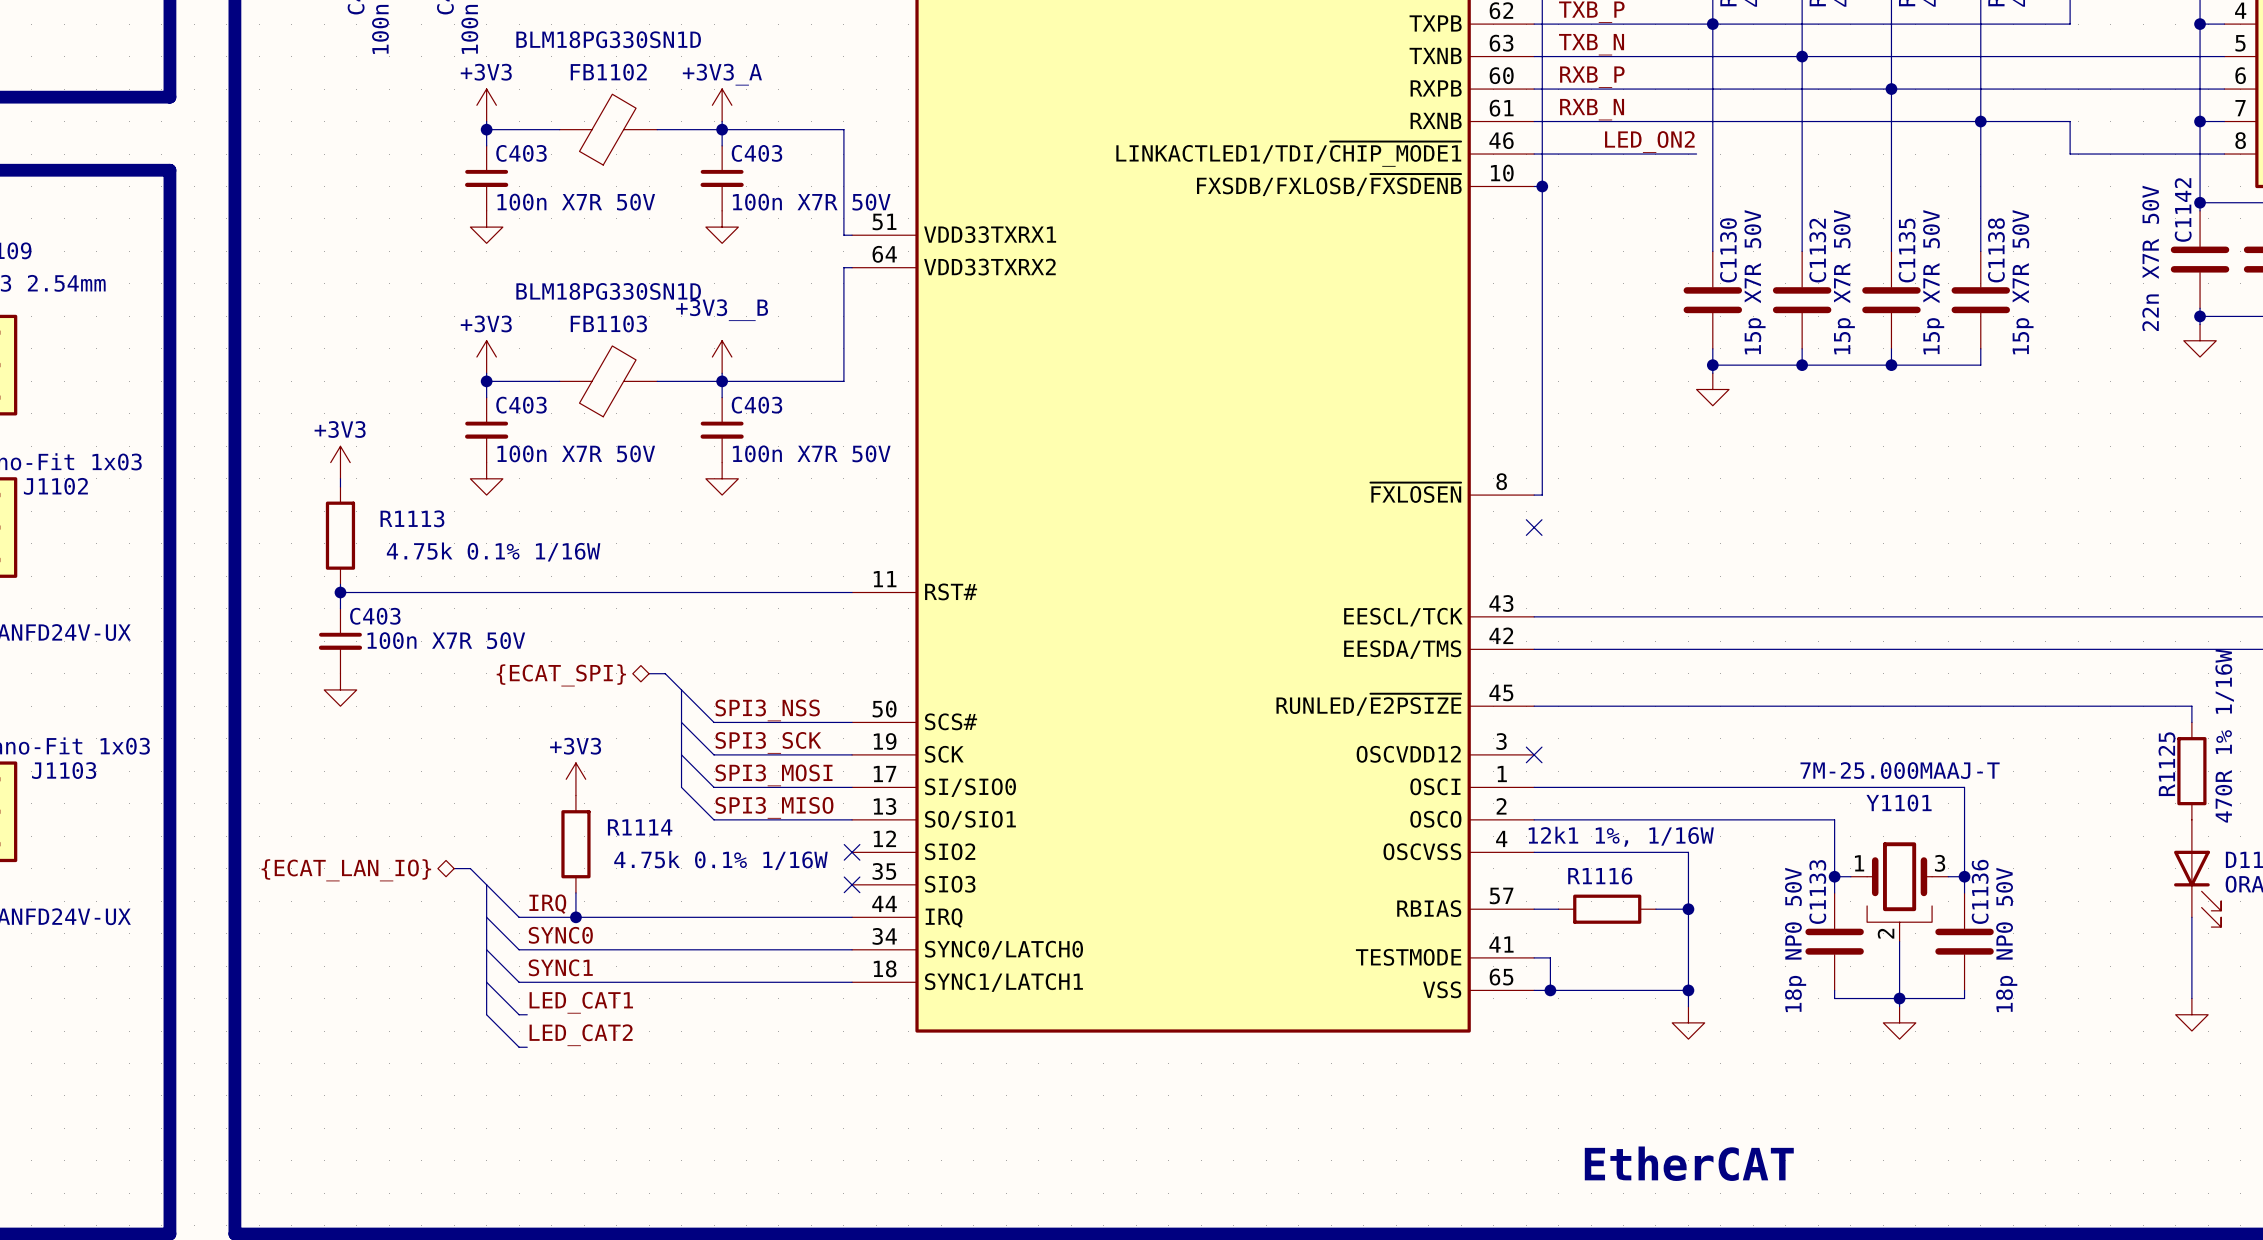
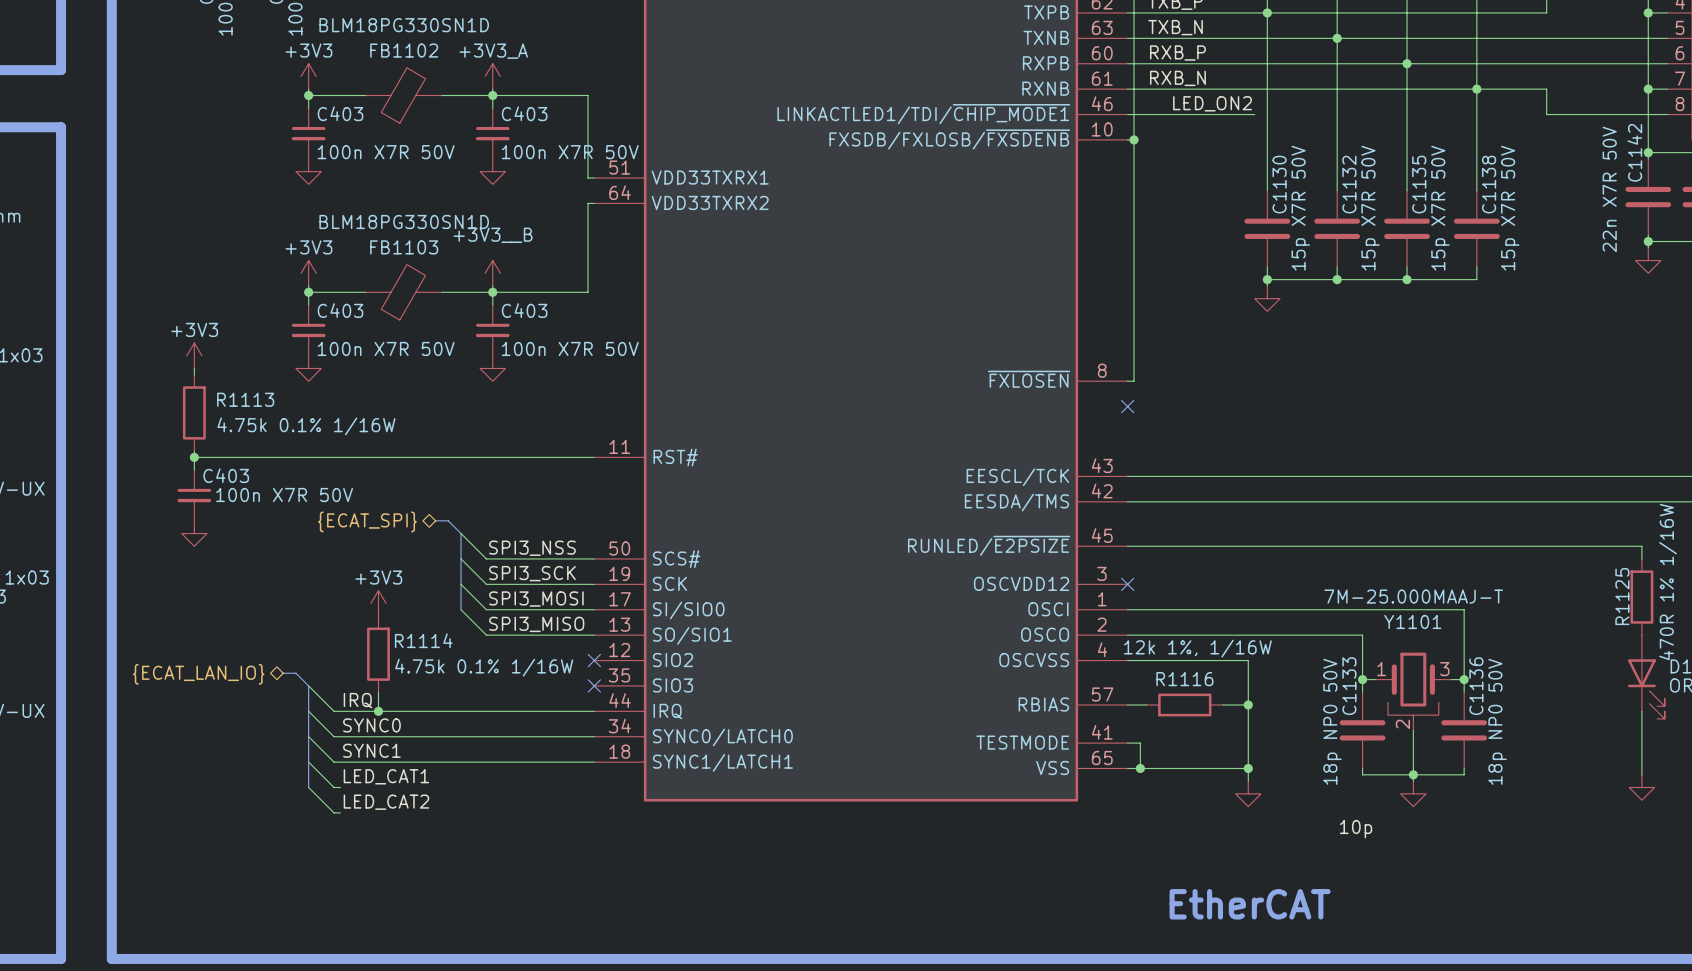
R1116 value: 12k1 1%, 1/16W (1621, 836) -> 12k 1%, 1/16W (1197, 648)
label: none -> 10p (1356, 829)

